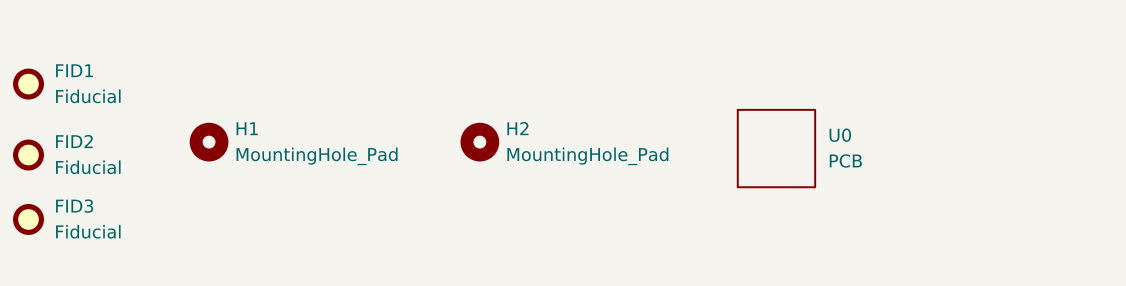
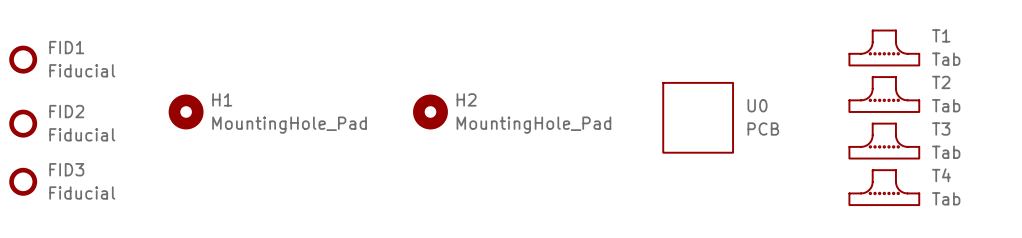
T1: none -> Tab (884, 47)
T2: none -> Tab (884, 94)
T3: none -> Tab (884, 141)
T4: none -> Tab (884, 187)

